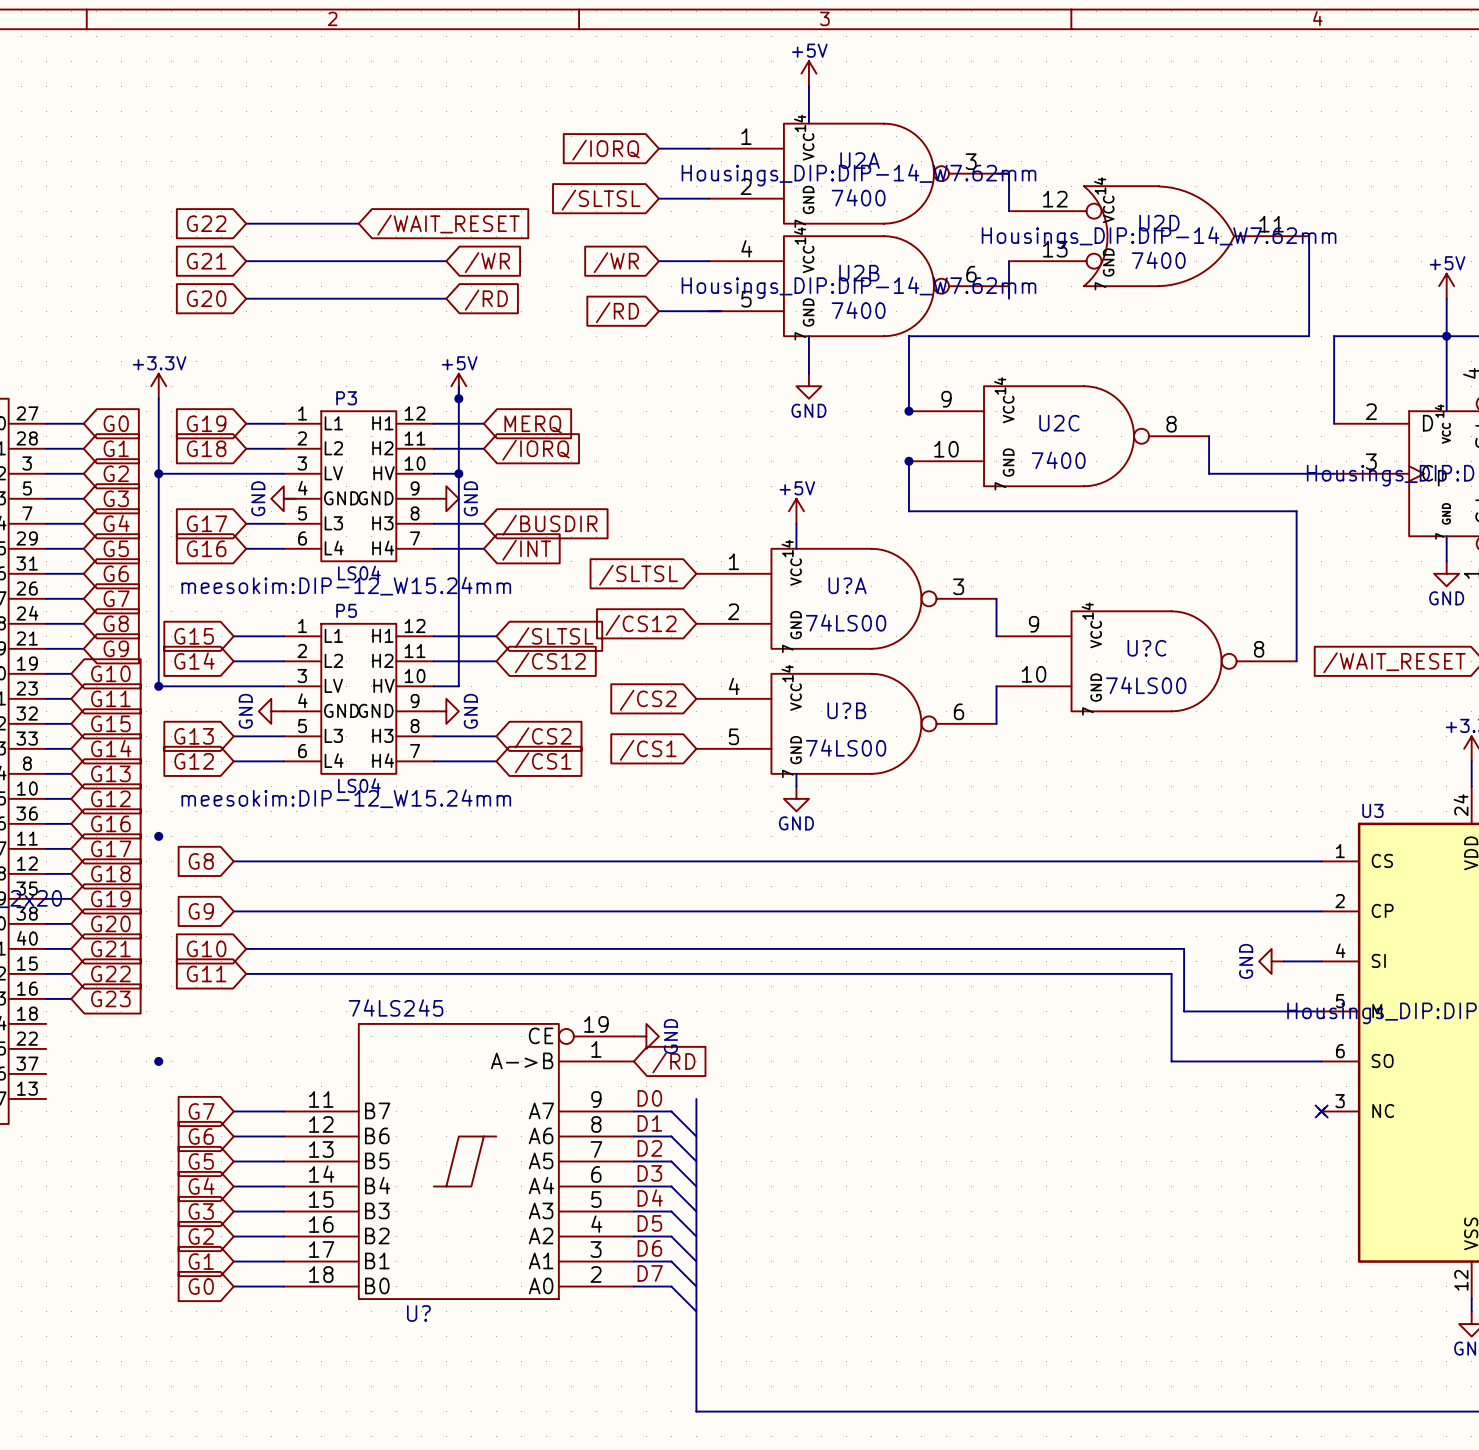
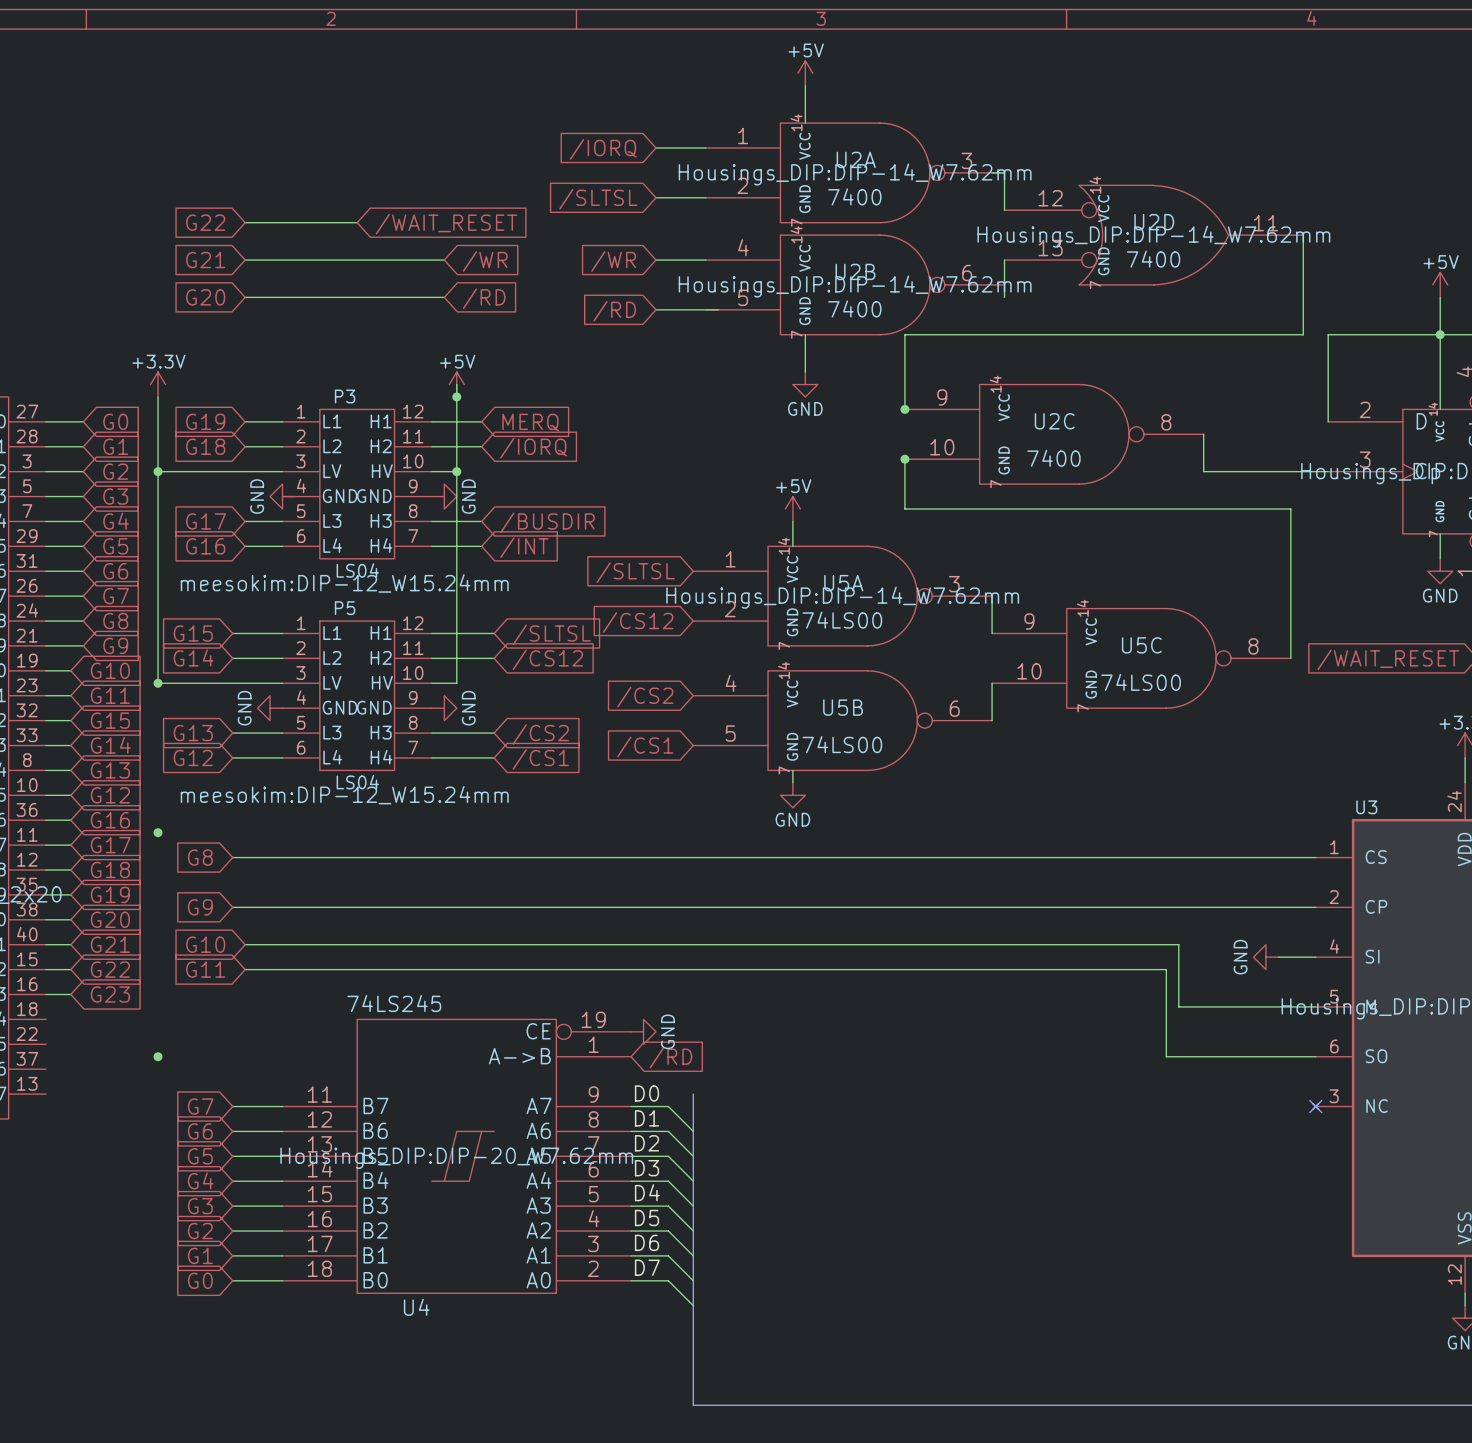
U?A name: U?A (847, 585) -> U5A (843, 583)
U?A text: none -> Housings_DIP:DIP-14_W7.62mm (842, 597)
U?C name: U?C (1146, 648) -> U5C (1141, 645)
U?B name: U?B (846, 710) -> U5B (843, 707)
U? text: none -> Housings_DIP:DIP-20_W7.62mm (456, 1158)
U? name: U? (418, 1313) -> U4 (416, 1307)

